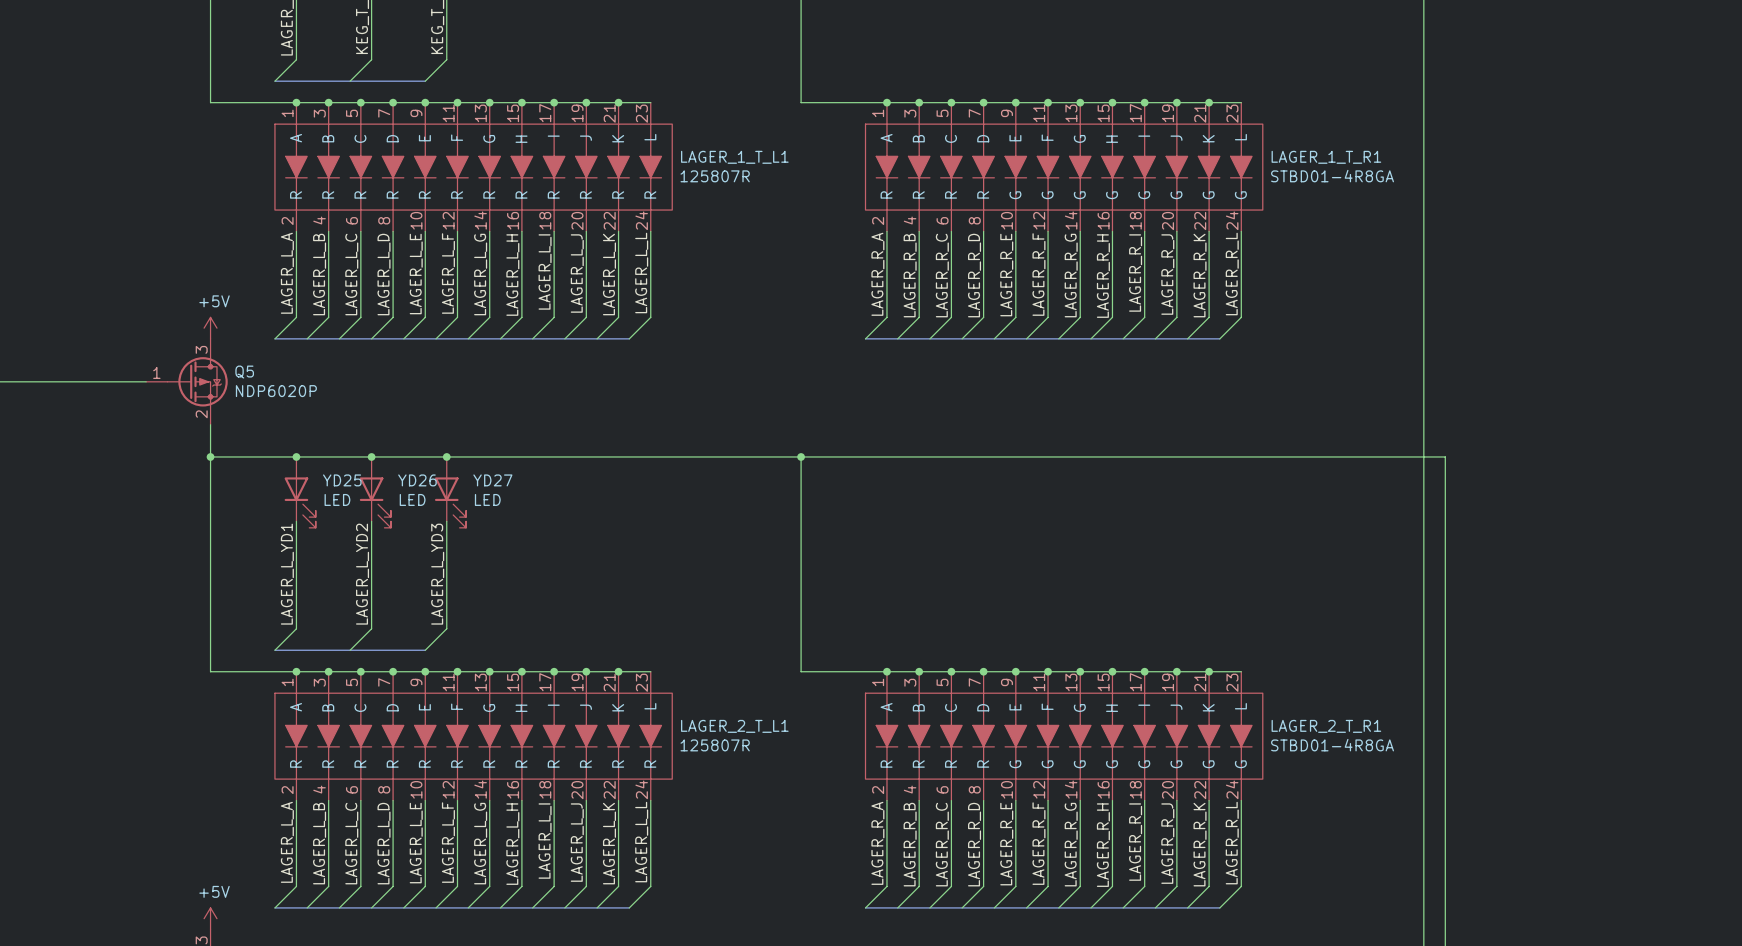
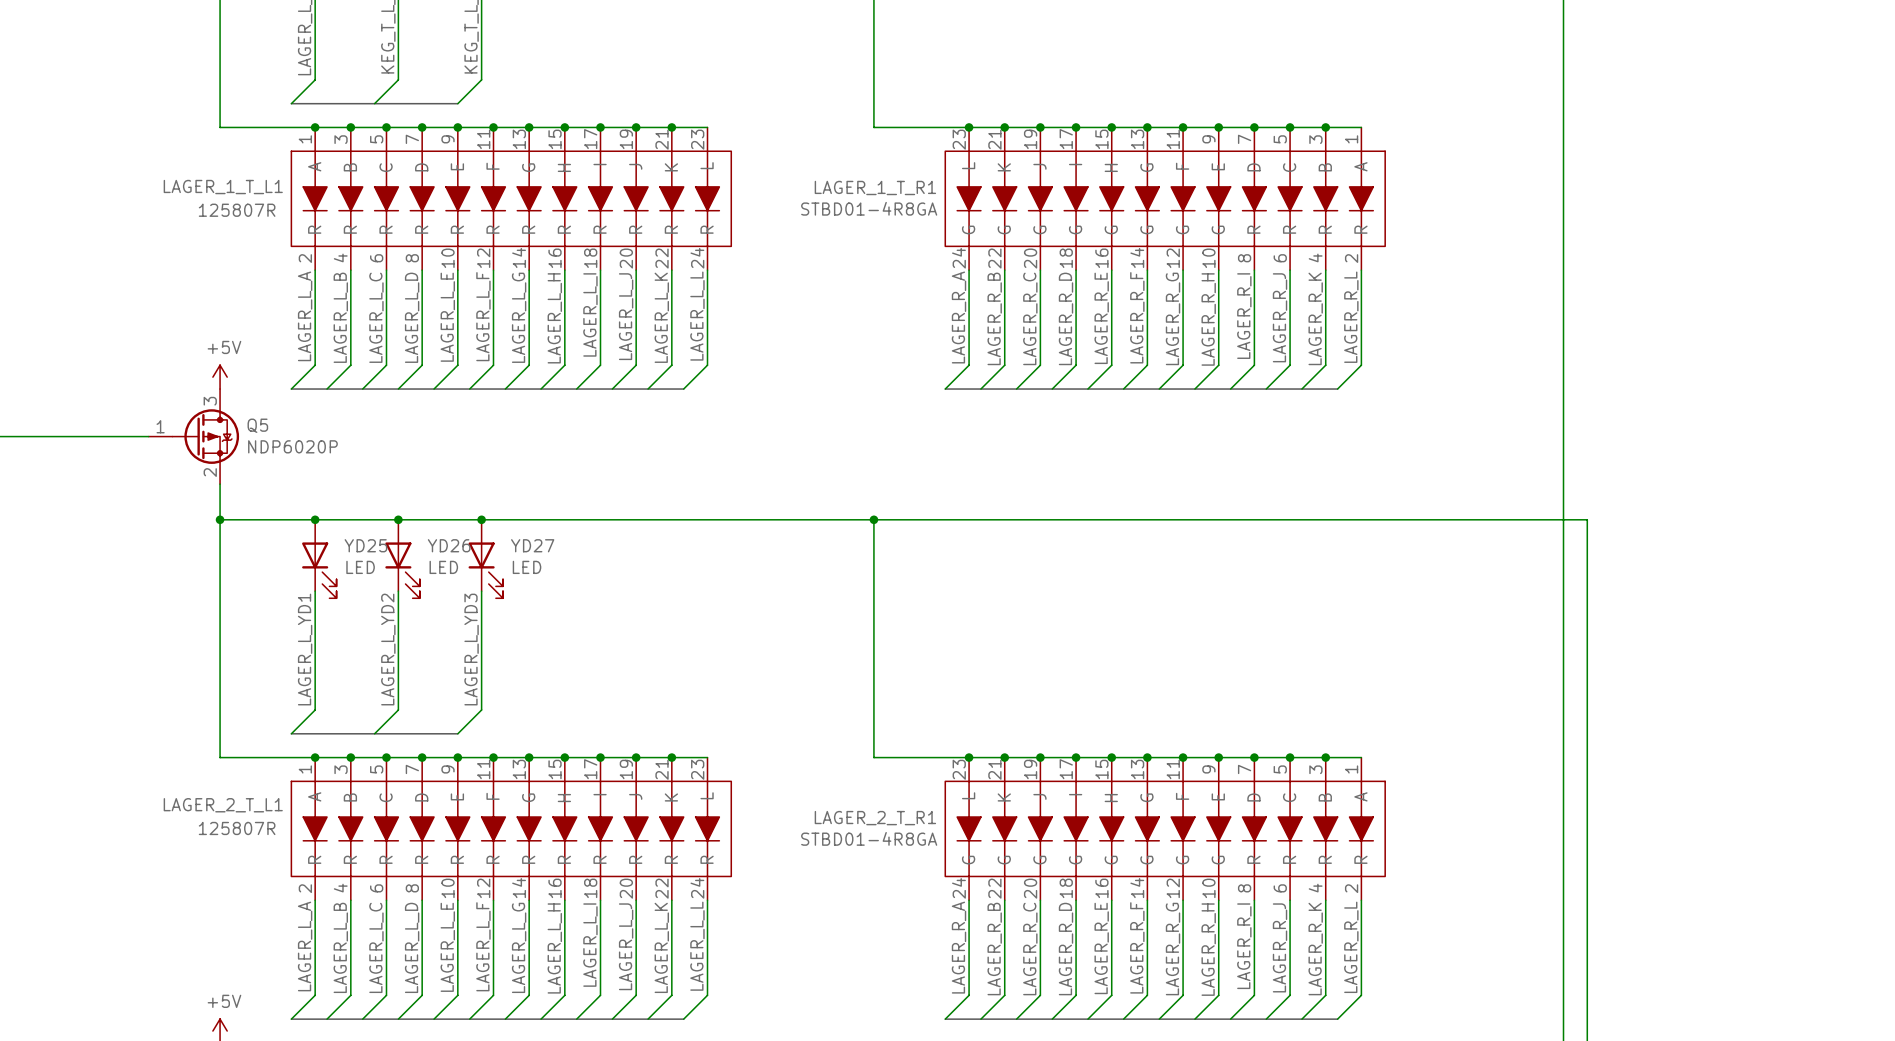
LAGER_1_T_L1 name position: LAGER_1_T_L1 (734, 157) -> LAGER_1_T_L1 (223, 187)
LAGER_1_T_R1 flip: as is (1064, 167) -> left-right (1165, 198)
LAGER_1_T_L1 value position: 125807R (715, 176) -> 125807R (237, 210)
LAGER_2_T_L1 name position: LAGER_2_T_L1 (734, 726) -> LAGER_2_T_L1 (223, 805)
LAGER_2_T_R1 flip: as is (1064, 736) -> left-right (1165, 828)
LAGER_2_T_L1 value position: 125807R (715, 745) -> 125807R (237, 828)

